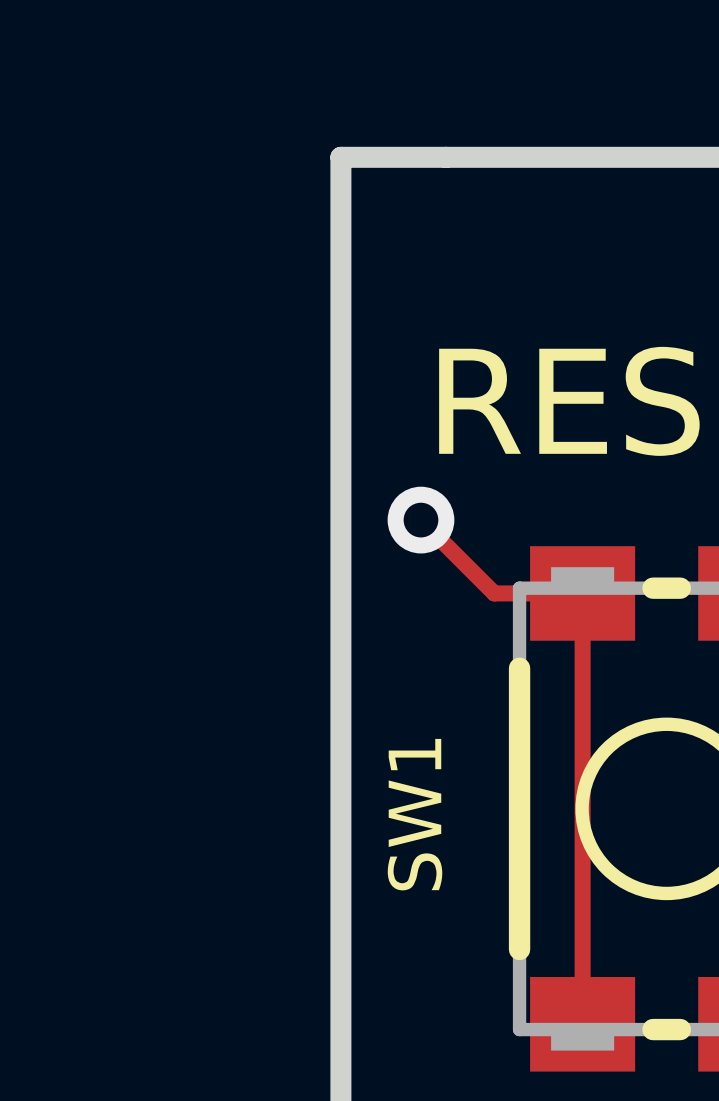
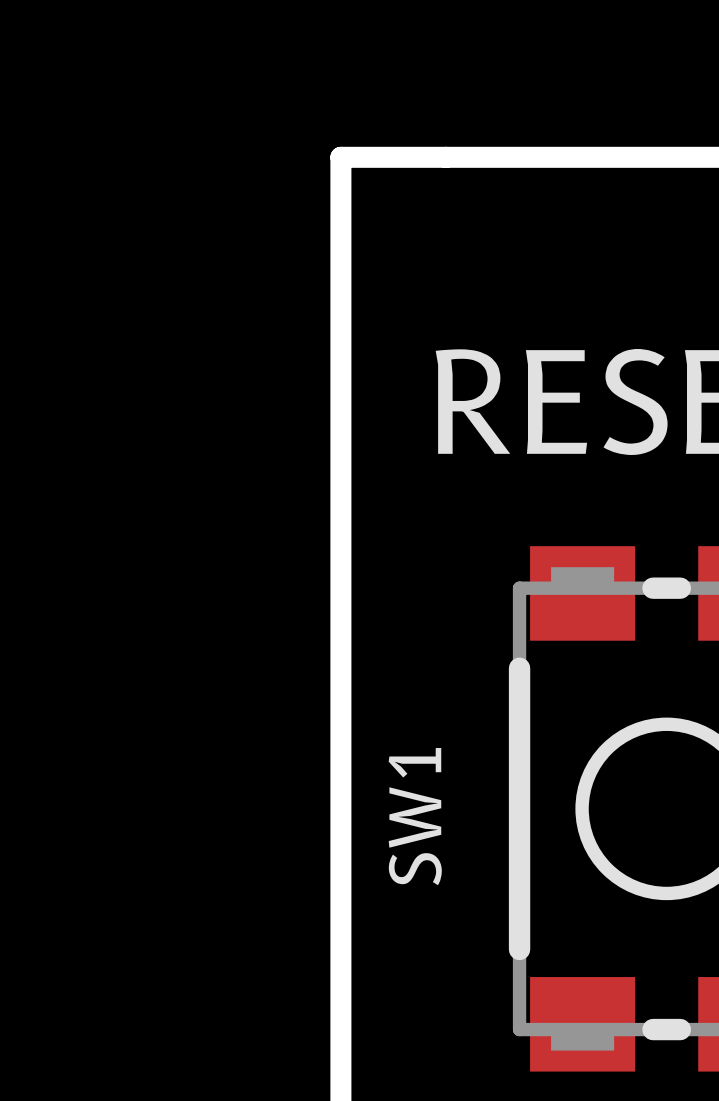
track: (420, 520) (494, 593) (582, 593) (582, 1024) -> none
via: (420, 520) -> none

